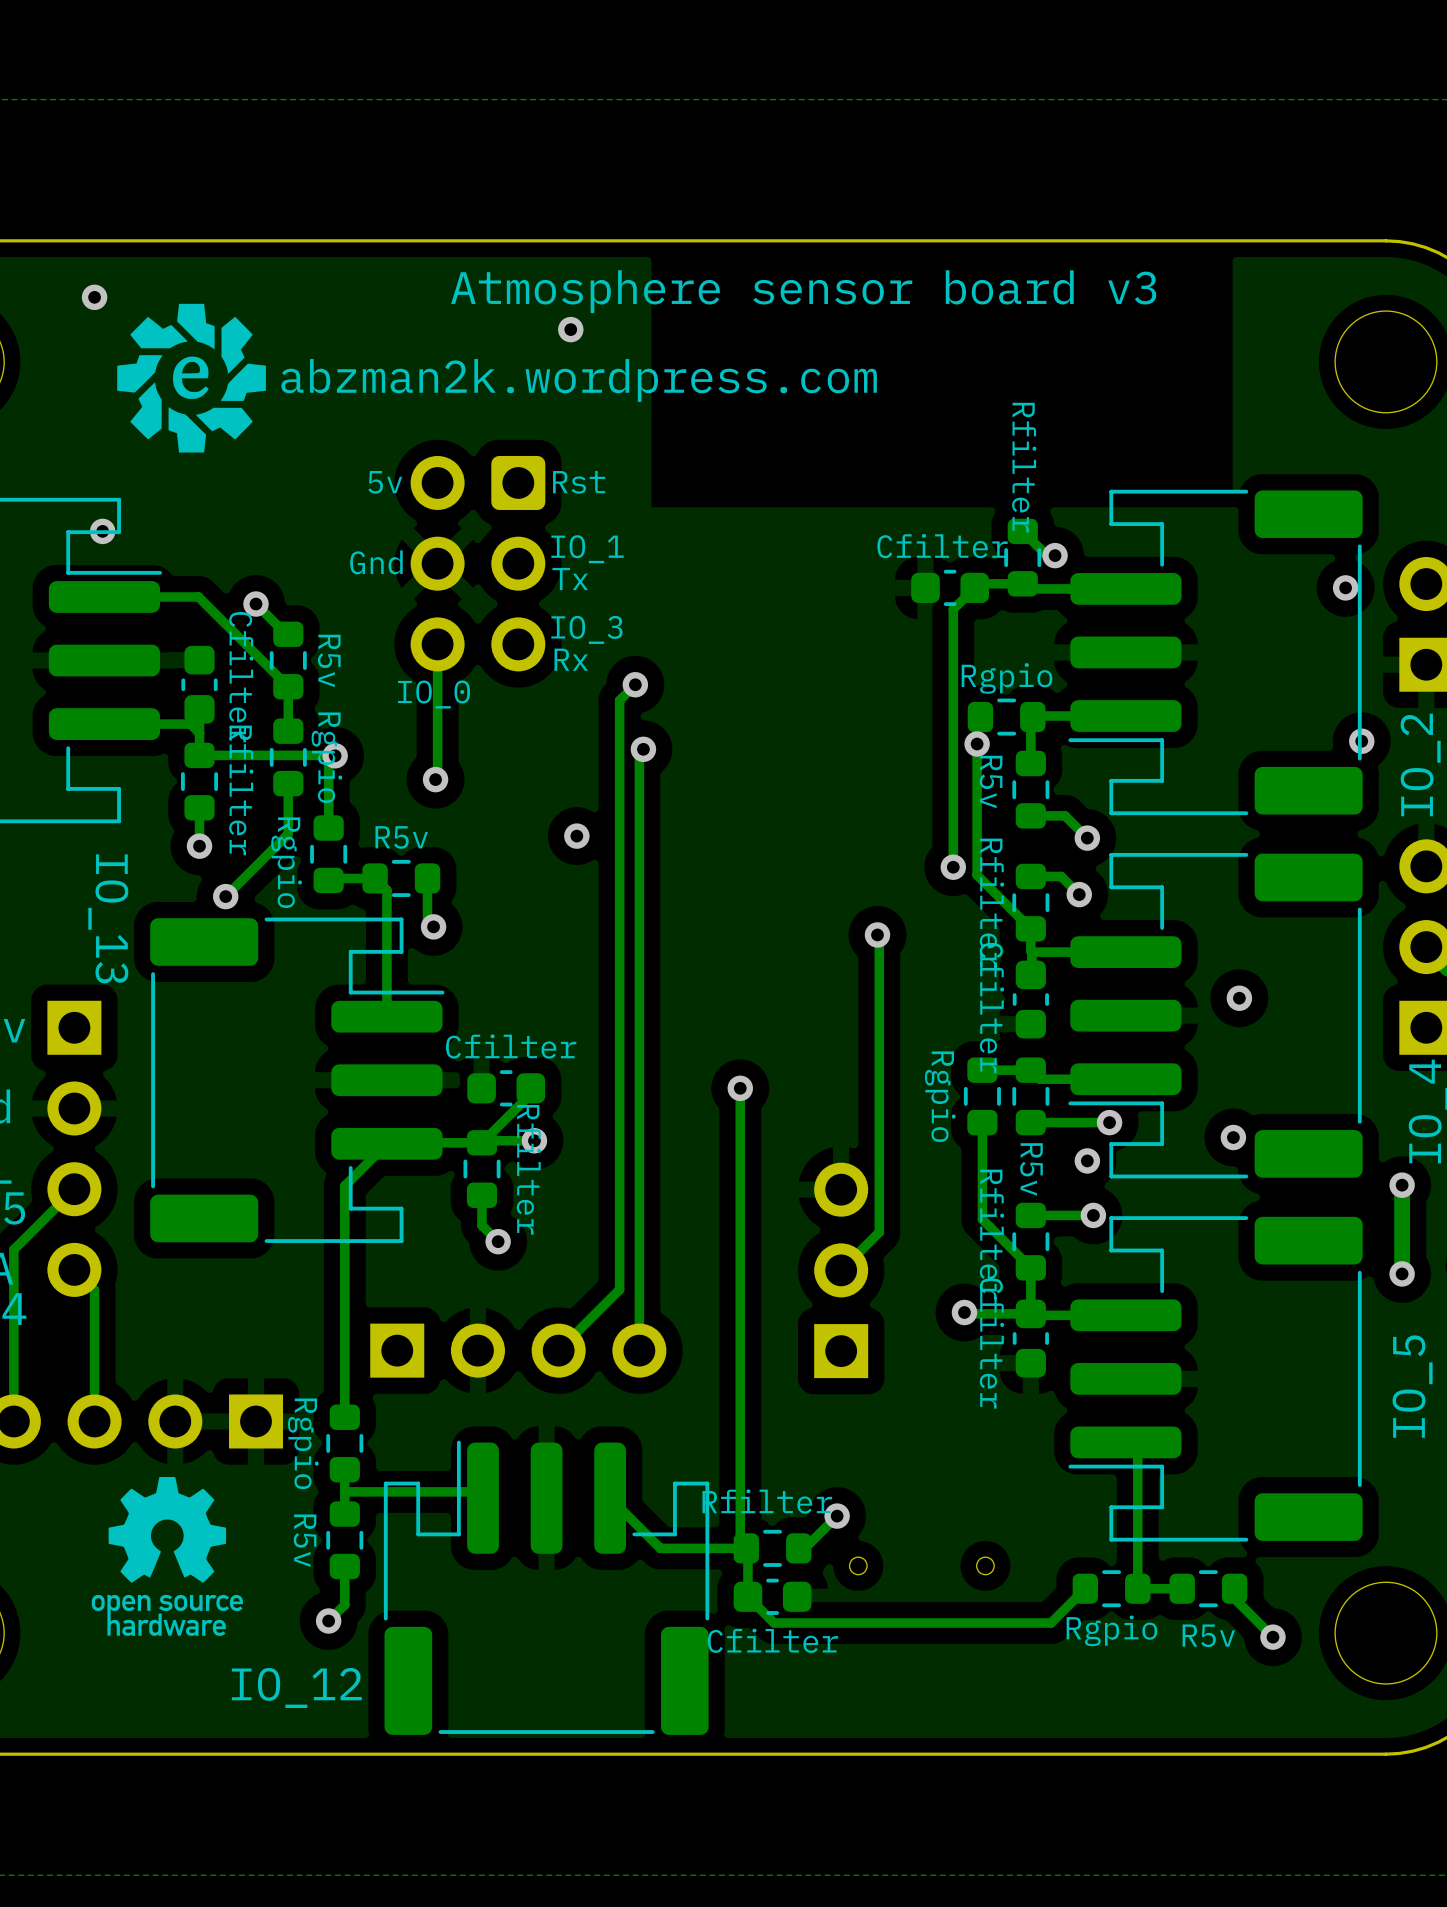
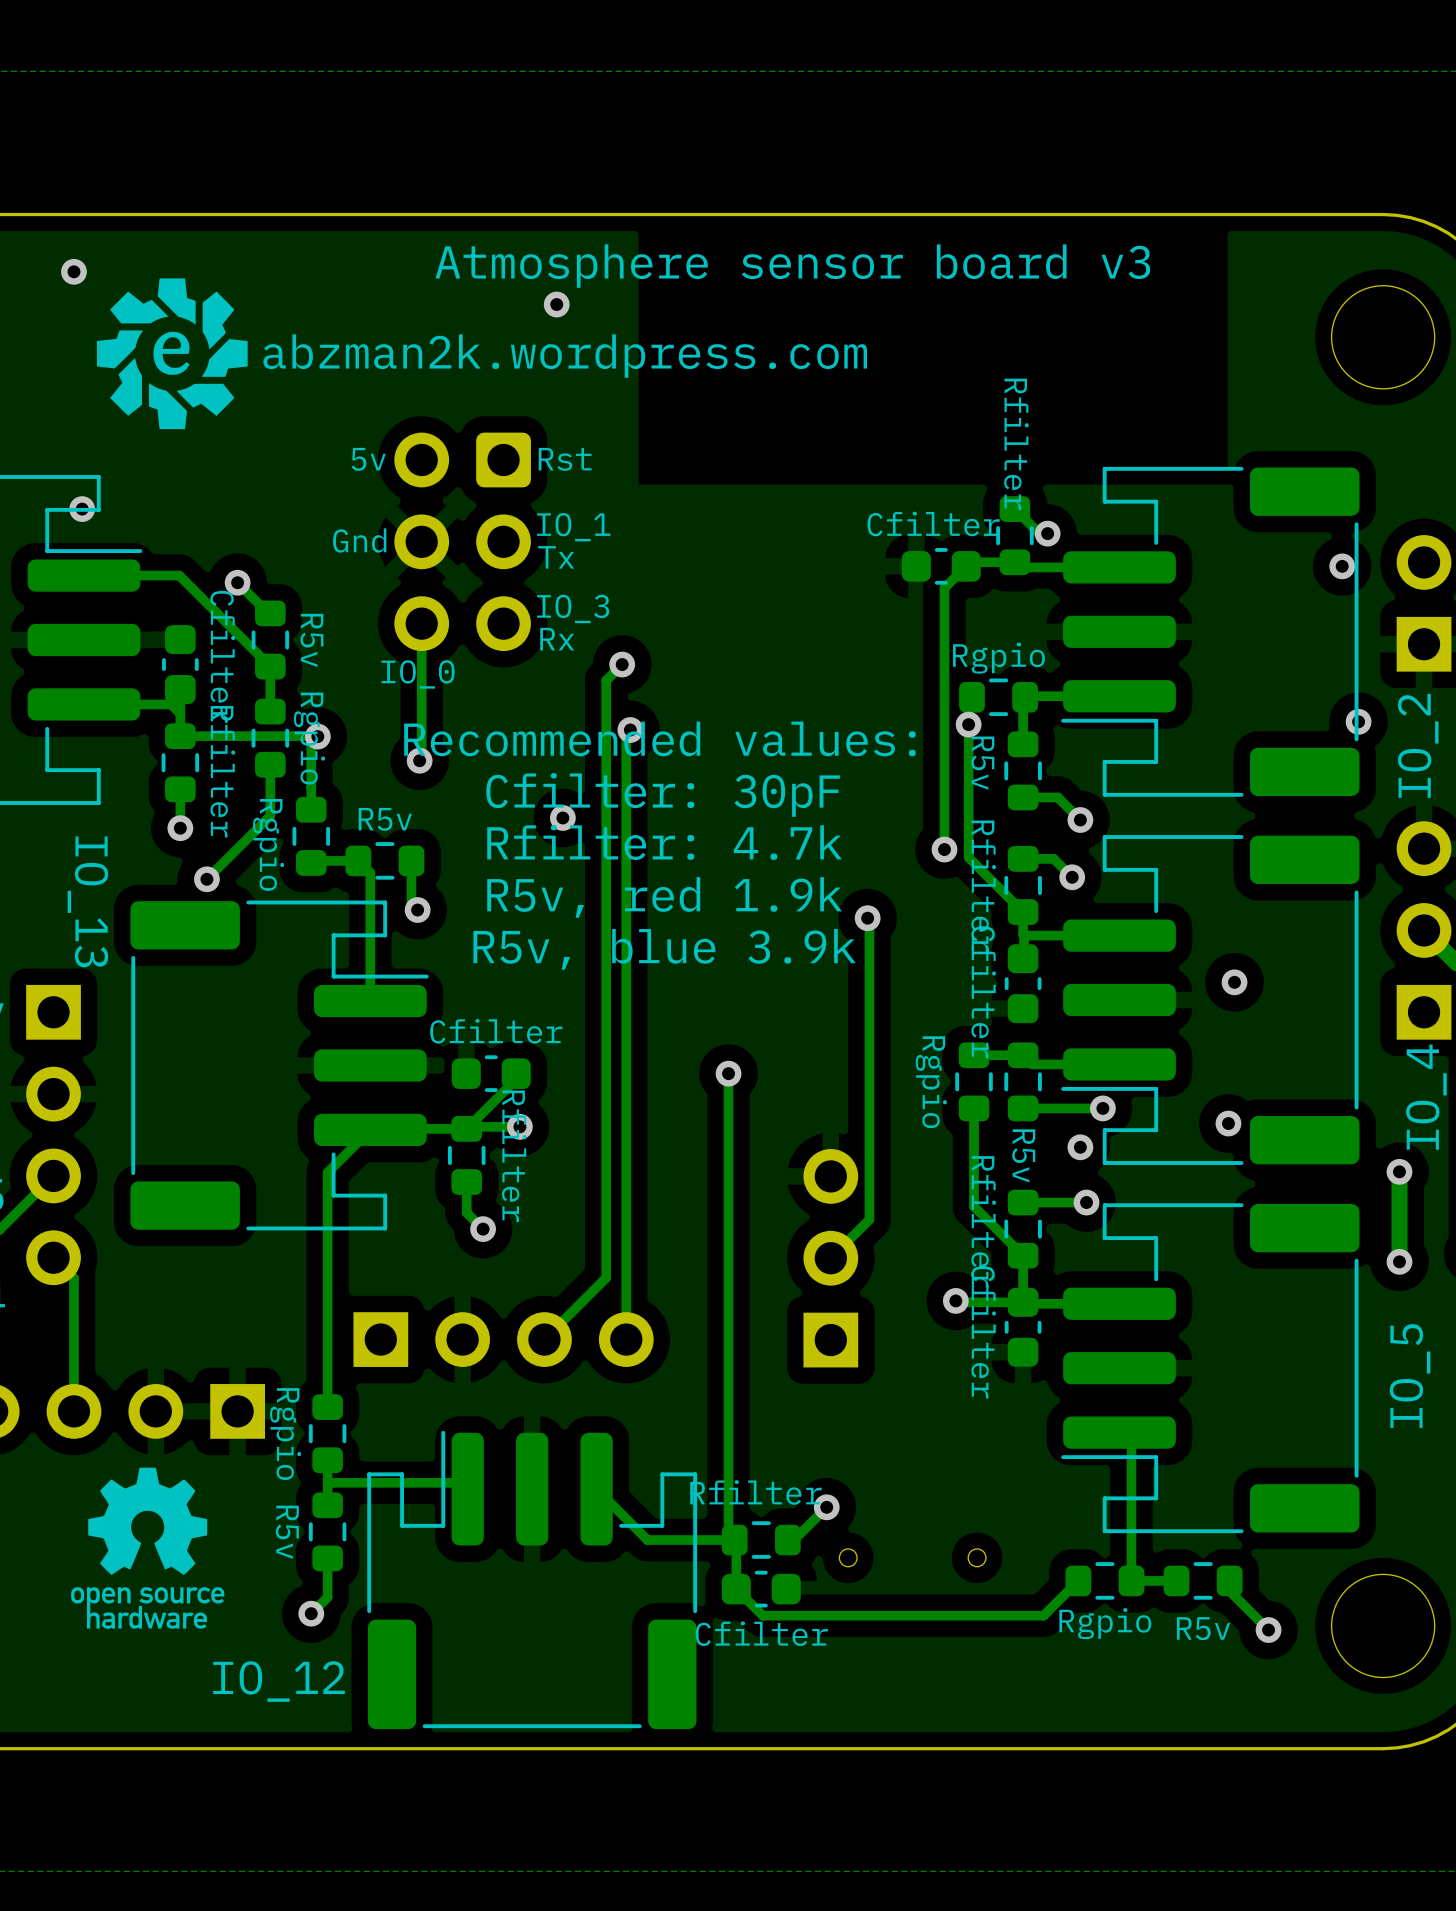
text: none -> Recommended values: (659, 738)
text: none -> Cfilter: 30pF (663, 794)
text: none -> Rfilter: 4.7k (664, 842)
text: none -> R5v, red 1.9k (664, 897)
text: none -> R5v, blue 3.9k (664, 949)

